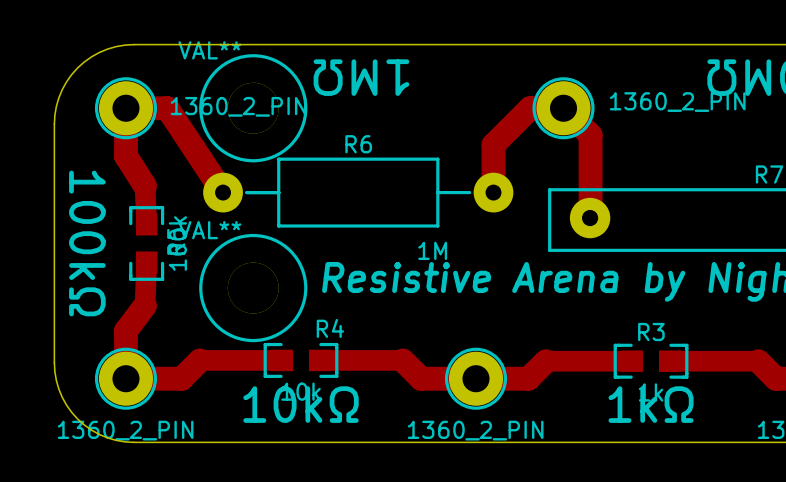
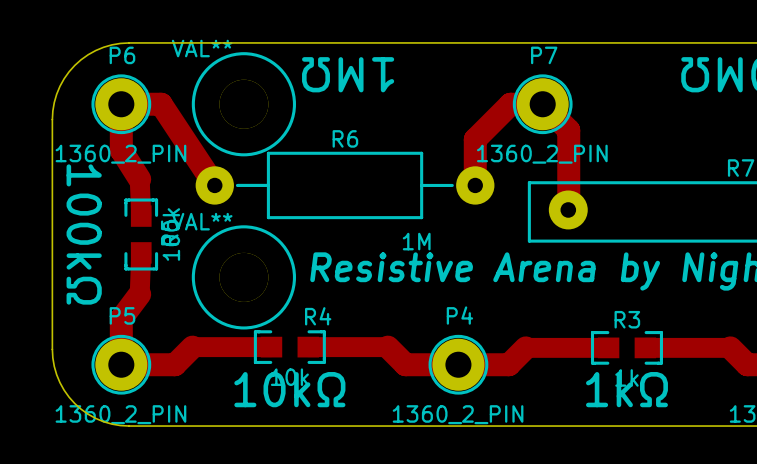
P6 name: none -> P6 (122, 55)
P7 name: none -> P7 (544, 55)
P7 value position: 1360_2_PIN (677, 102) -> 1360_2_PIN (542, 154)
P6 value position: 1360_2_PIN (238, 106) -> 1360_2_PIN (120, 154)
P4 name: none -> P4 (459, 315)
P5 name: none -> P5 (122, 315)

